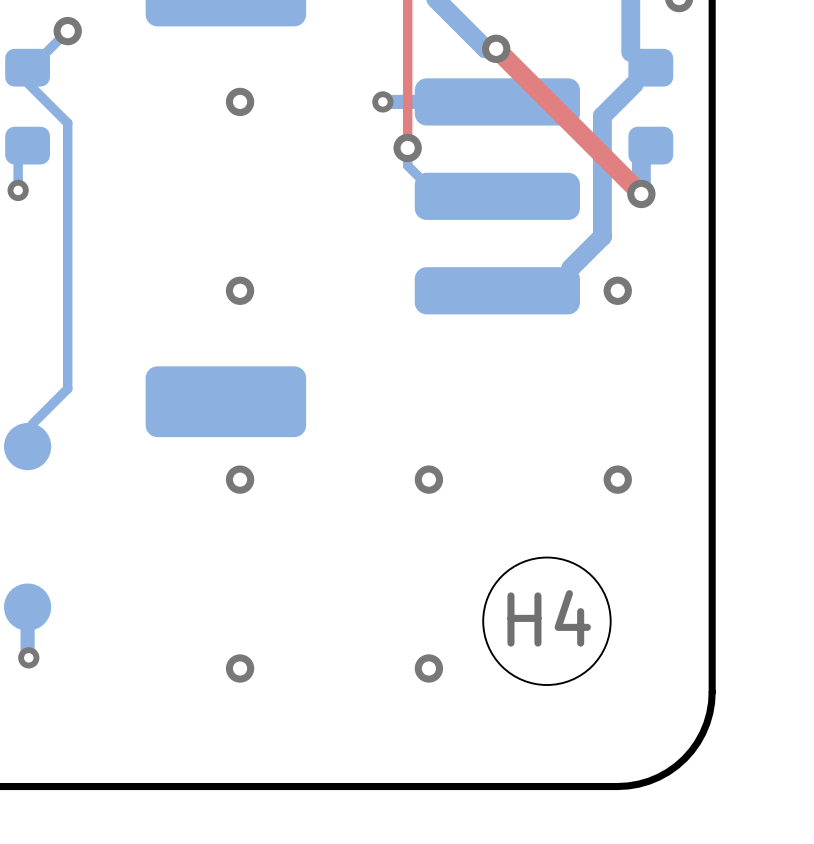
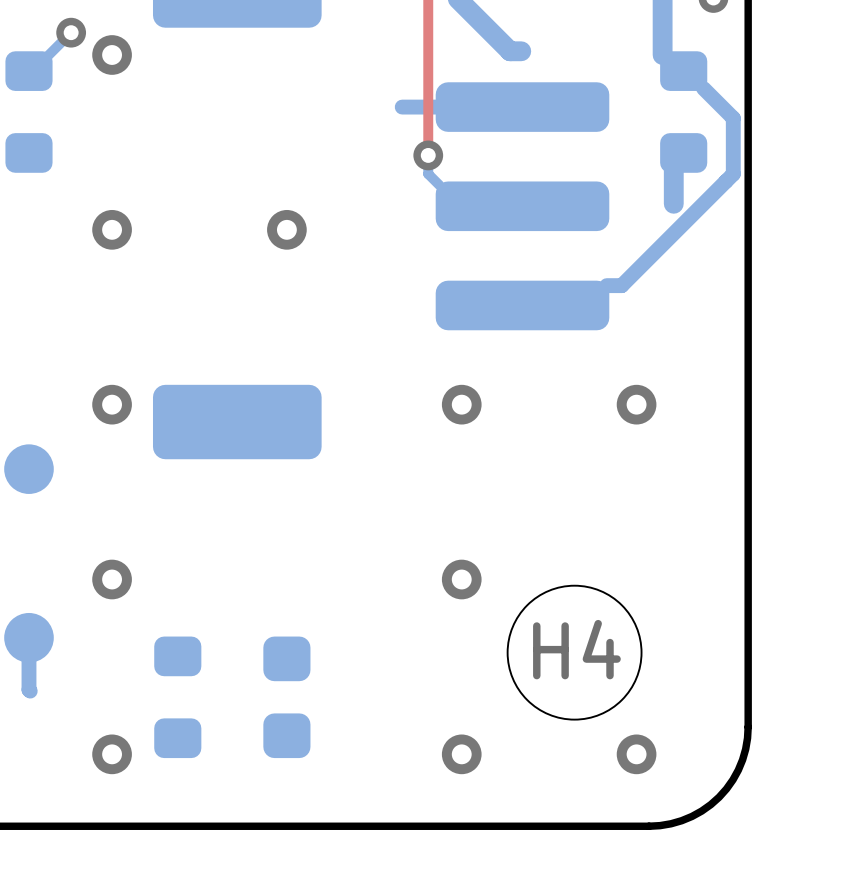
top track: (496, 48) (641, 193) -> none
via: (496, 48) -> none
via: none -> (112, 54)
bottom track: (28, 84) (67, 123) (67, 388) (32, 424) -> none
bottom track: (634, 84) (602, 116) (602, 236) (570, 268) -> none
bottom track: none -> (703, 88) (733, 118) (733, 174) (621, 285) (606, 285)
via: (240, 101) -> none
via: (382, 101) -> none
bottom track: (18, 162) (18, 190) -> none
via: (18, 190) -> none
via: (641, 193) -> none
via: none -> (112, 229)
via: none -> (286, 229)
via: (240, 290) -> none
via: (617, 290) -> none
via: none -> (112, 404)
via: none -> (461, 404)
via: none -> (636, 404)
via: (240, 479) -> none
via: (428, 479) -> none
via: (617, 479) -> none
via: none -> (112, 579)
via: none -> (461, 579)
via: (28, 657) -> none
part: none -> (177, 697)
part: none -> (286, 697)
via: (240, 668) -> none
via: (428, 668) -> none
via: none -> (112, 754)
via: none -> (461, 754)
via: none -> (636, 754)

